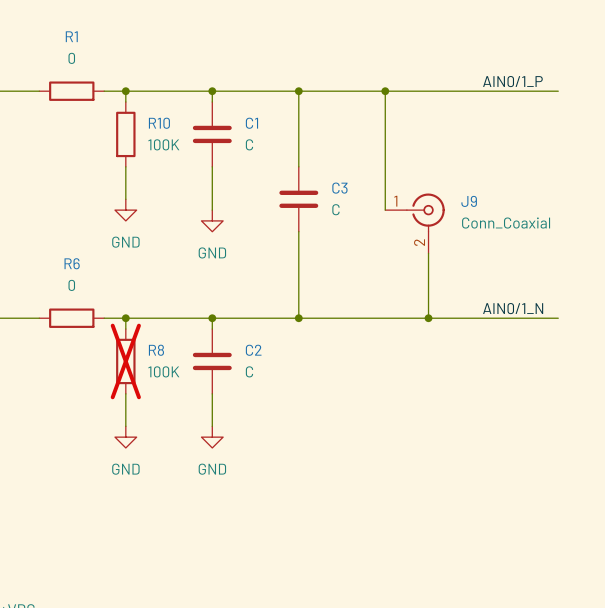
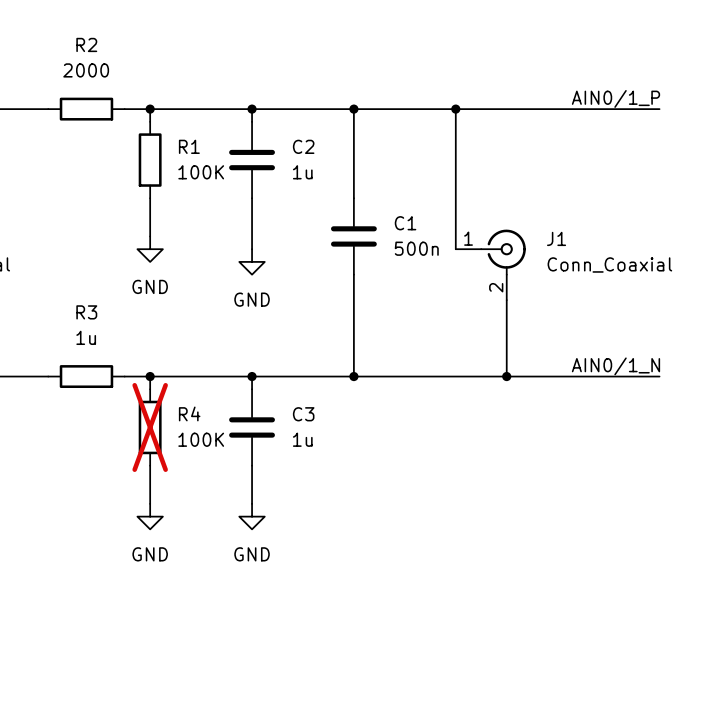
R1 name: R1 (71, 36) -> R2 (86, 44)
R1 value: 0 (71, 58) -> 2000 (86, 70)
R10 name: R10 (159, 123) -> R1 (189, 146)
C1 name: C1 (251, 123) -> C2 (303, 146)
C1 value: C (249, 144) -> 1u (302, 172)
C3 name: C3 (339, 188) -> C1 (405, 223)
J9 name: J9 (469, 201) -> J1 (556, 238)
C3 value: C (335, 209) -> 500n (416, 248)
R6 name: R6 (72, 263) -> R3 (86, 312)
R6 value: 0 (71, 285) -> 1u (86, 337)
R8 name: R8 (156, 350) -> R4 (189, 413)
C2 name: C2 (253, 350) -> C3 (303, 414)
C2 value: C (249, 371) -> 1u (302, 439)

